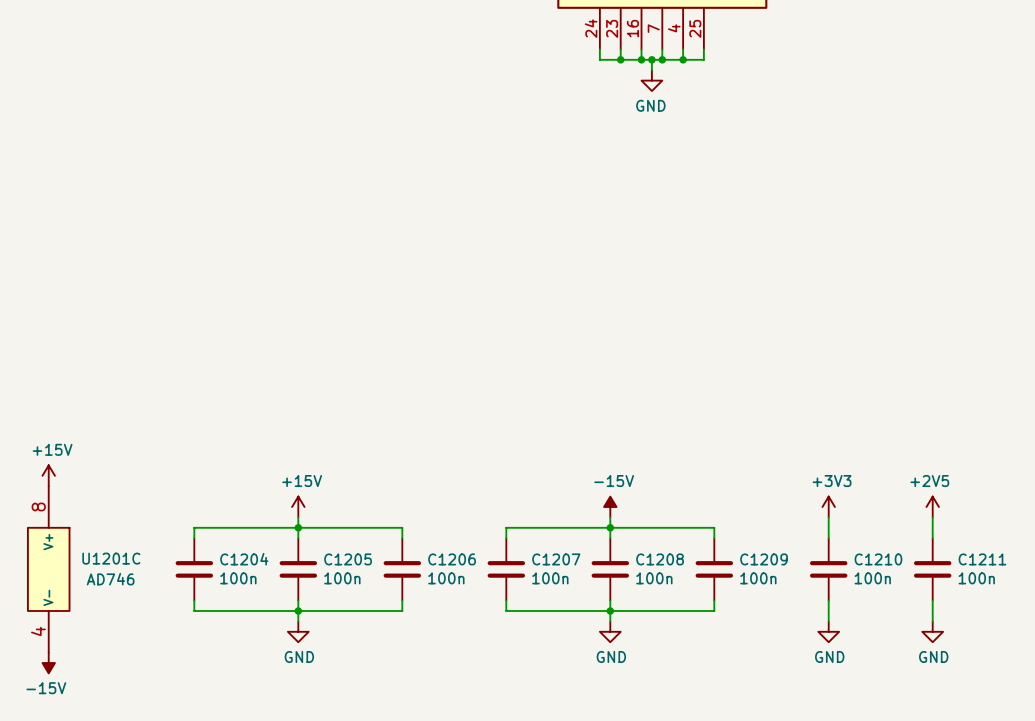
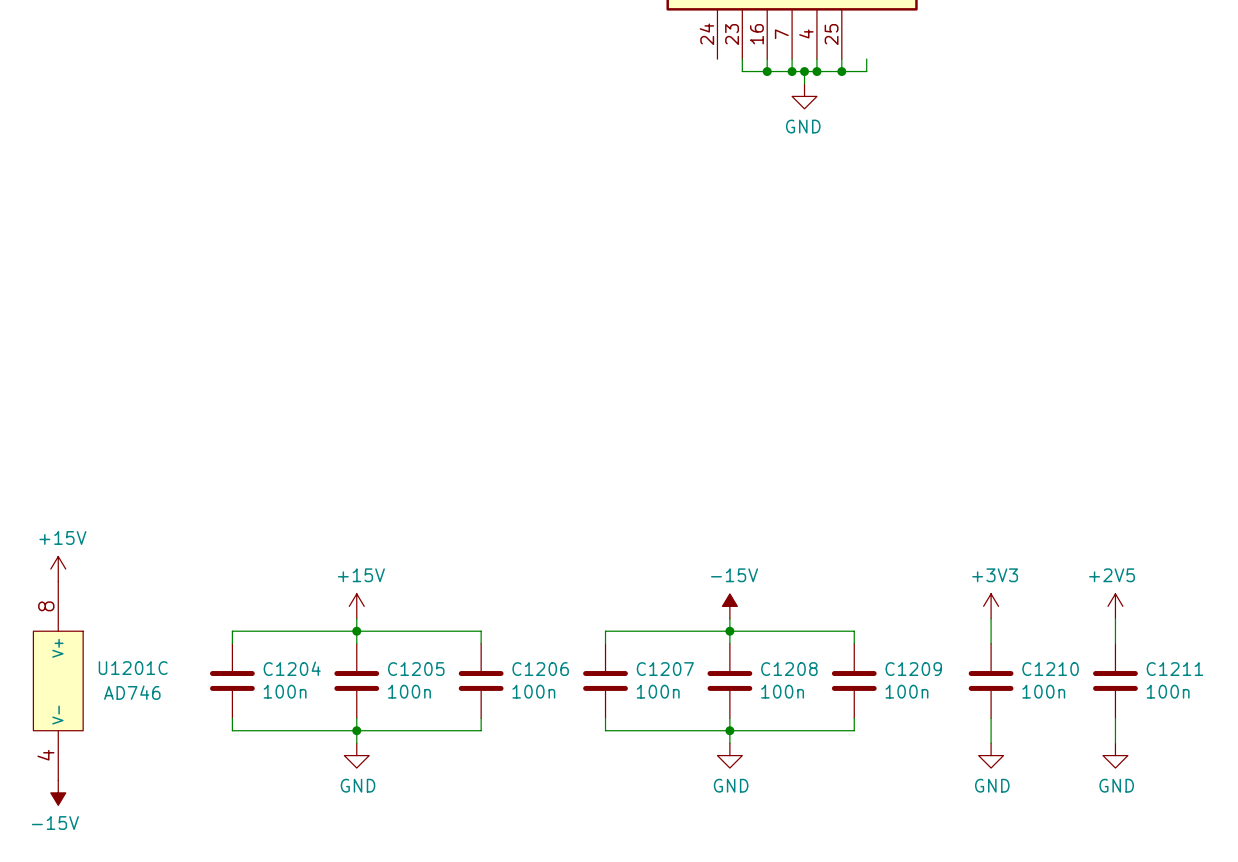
wire: (599, 49) (599, 59) (620, 59) -> none
wire: none -> (866, 59) (866, 71) (841, 71)
junction: (620, 59) -> none
wire: (651, 59) (651, 70) -> (804, 71) (804, 83)
junction position: (651, 59) -> (804, 71)
junction: none -> (841, 71)
power symbol position: GND (651, 80) -> GND (804, 96)

